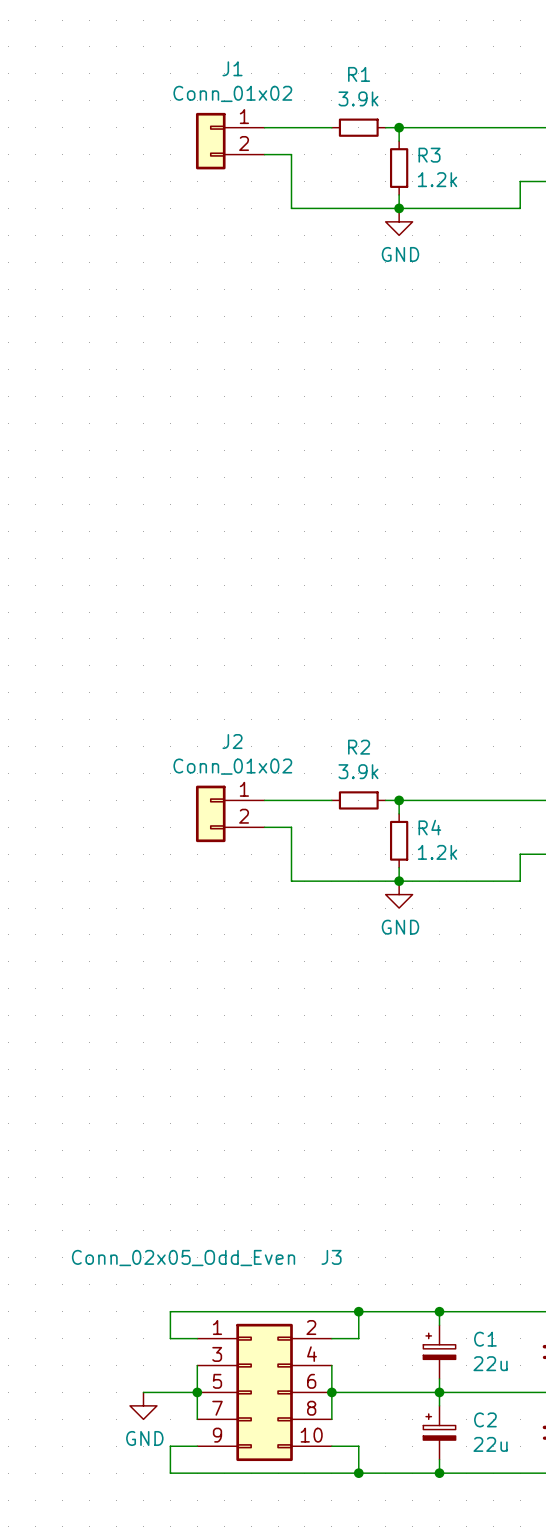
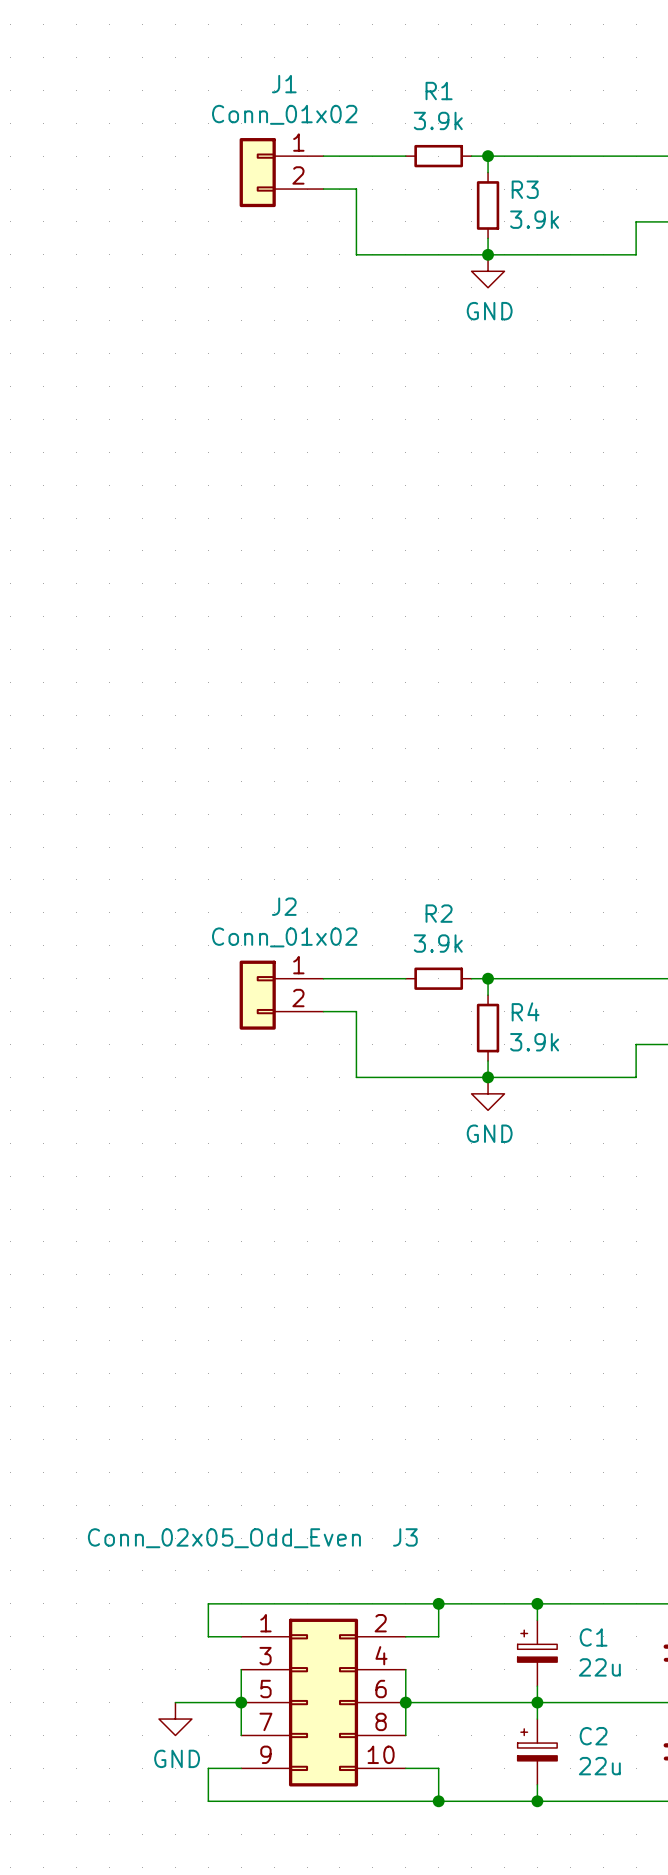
R3 value: 1.2k (437, 179) -> 3.9k (534, 219)
R4 value: 1.2k (437, 852) -> 3.9k (534, 1042)

